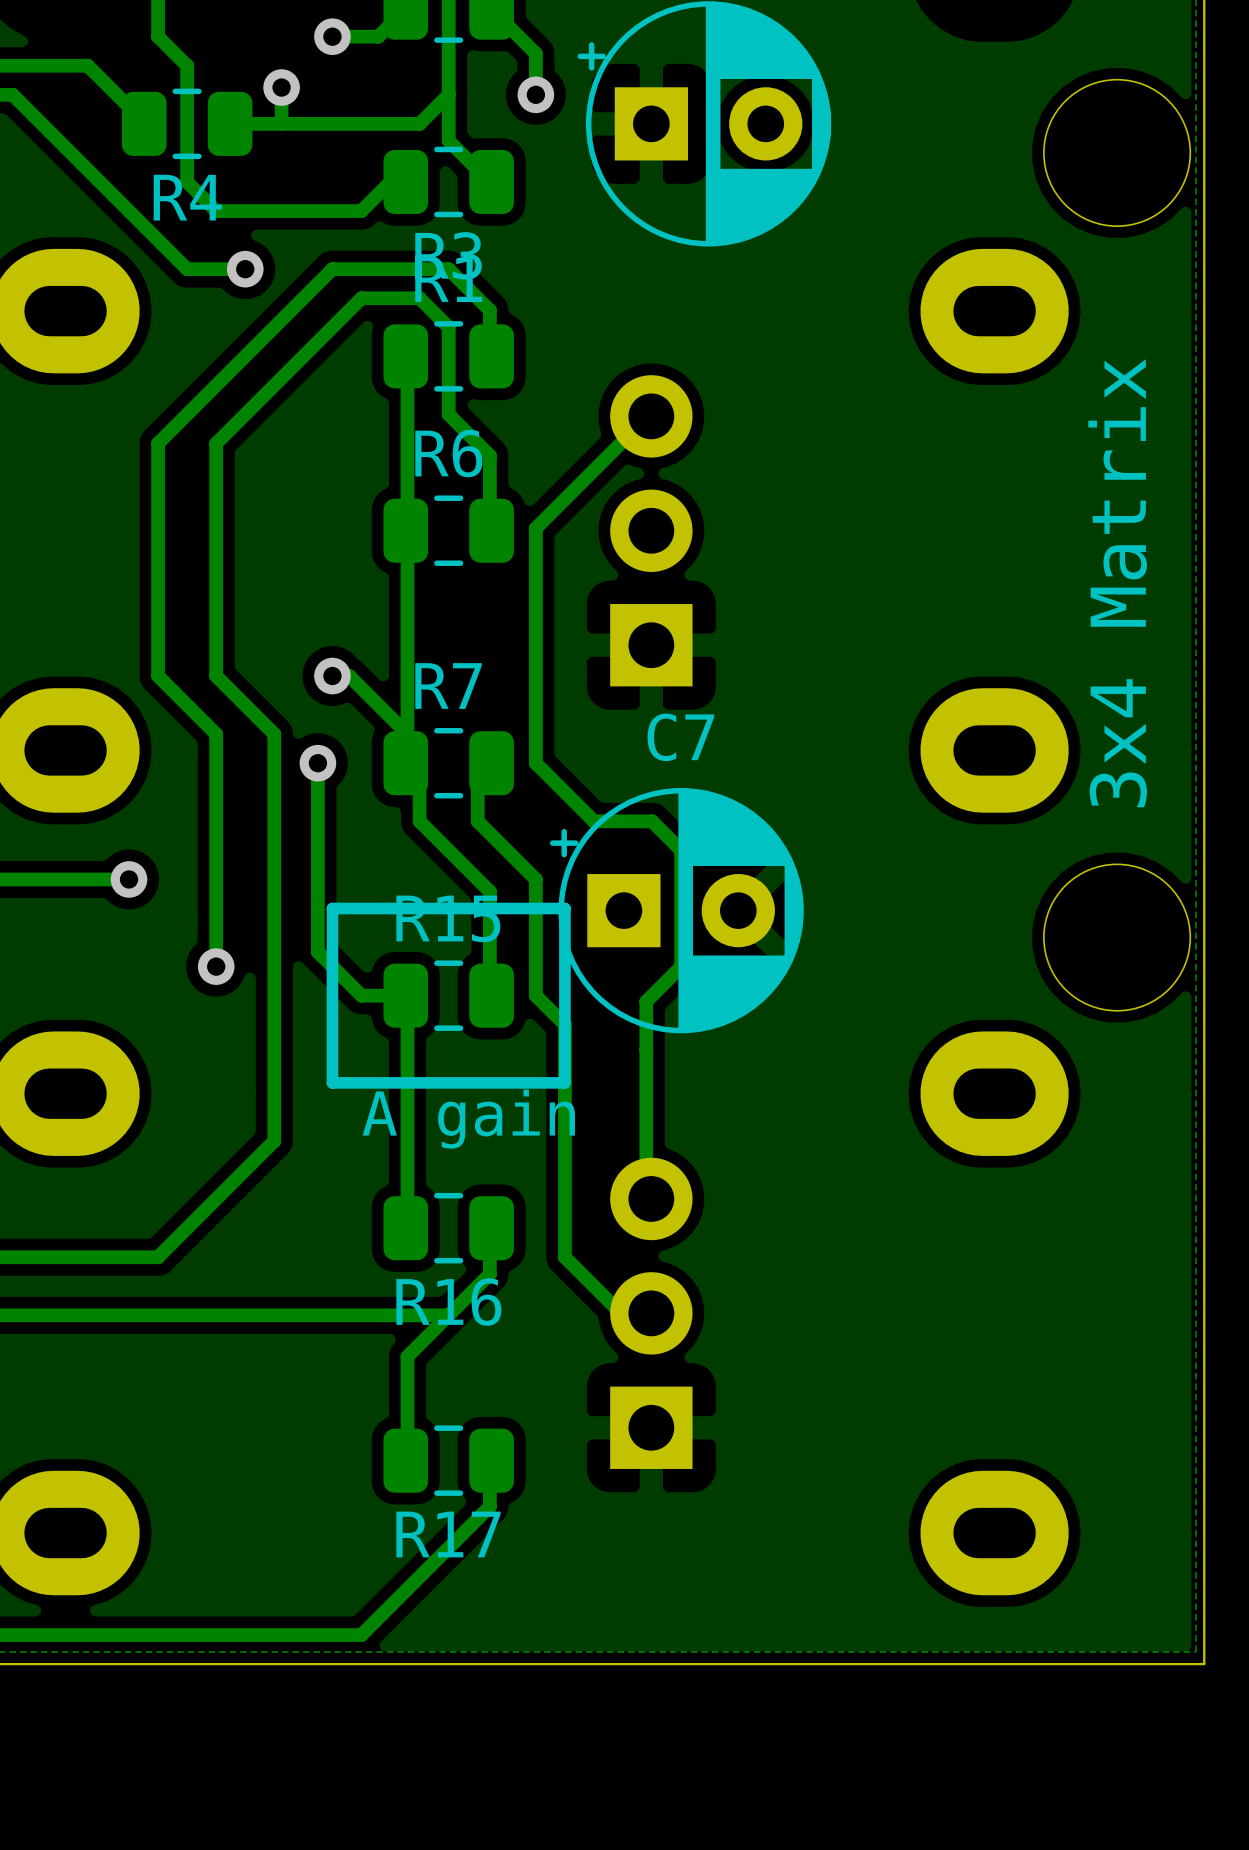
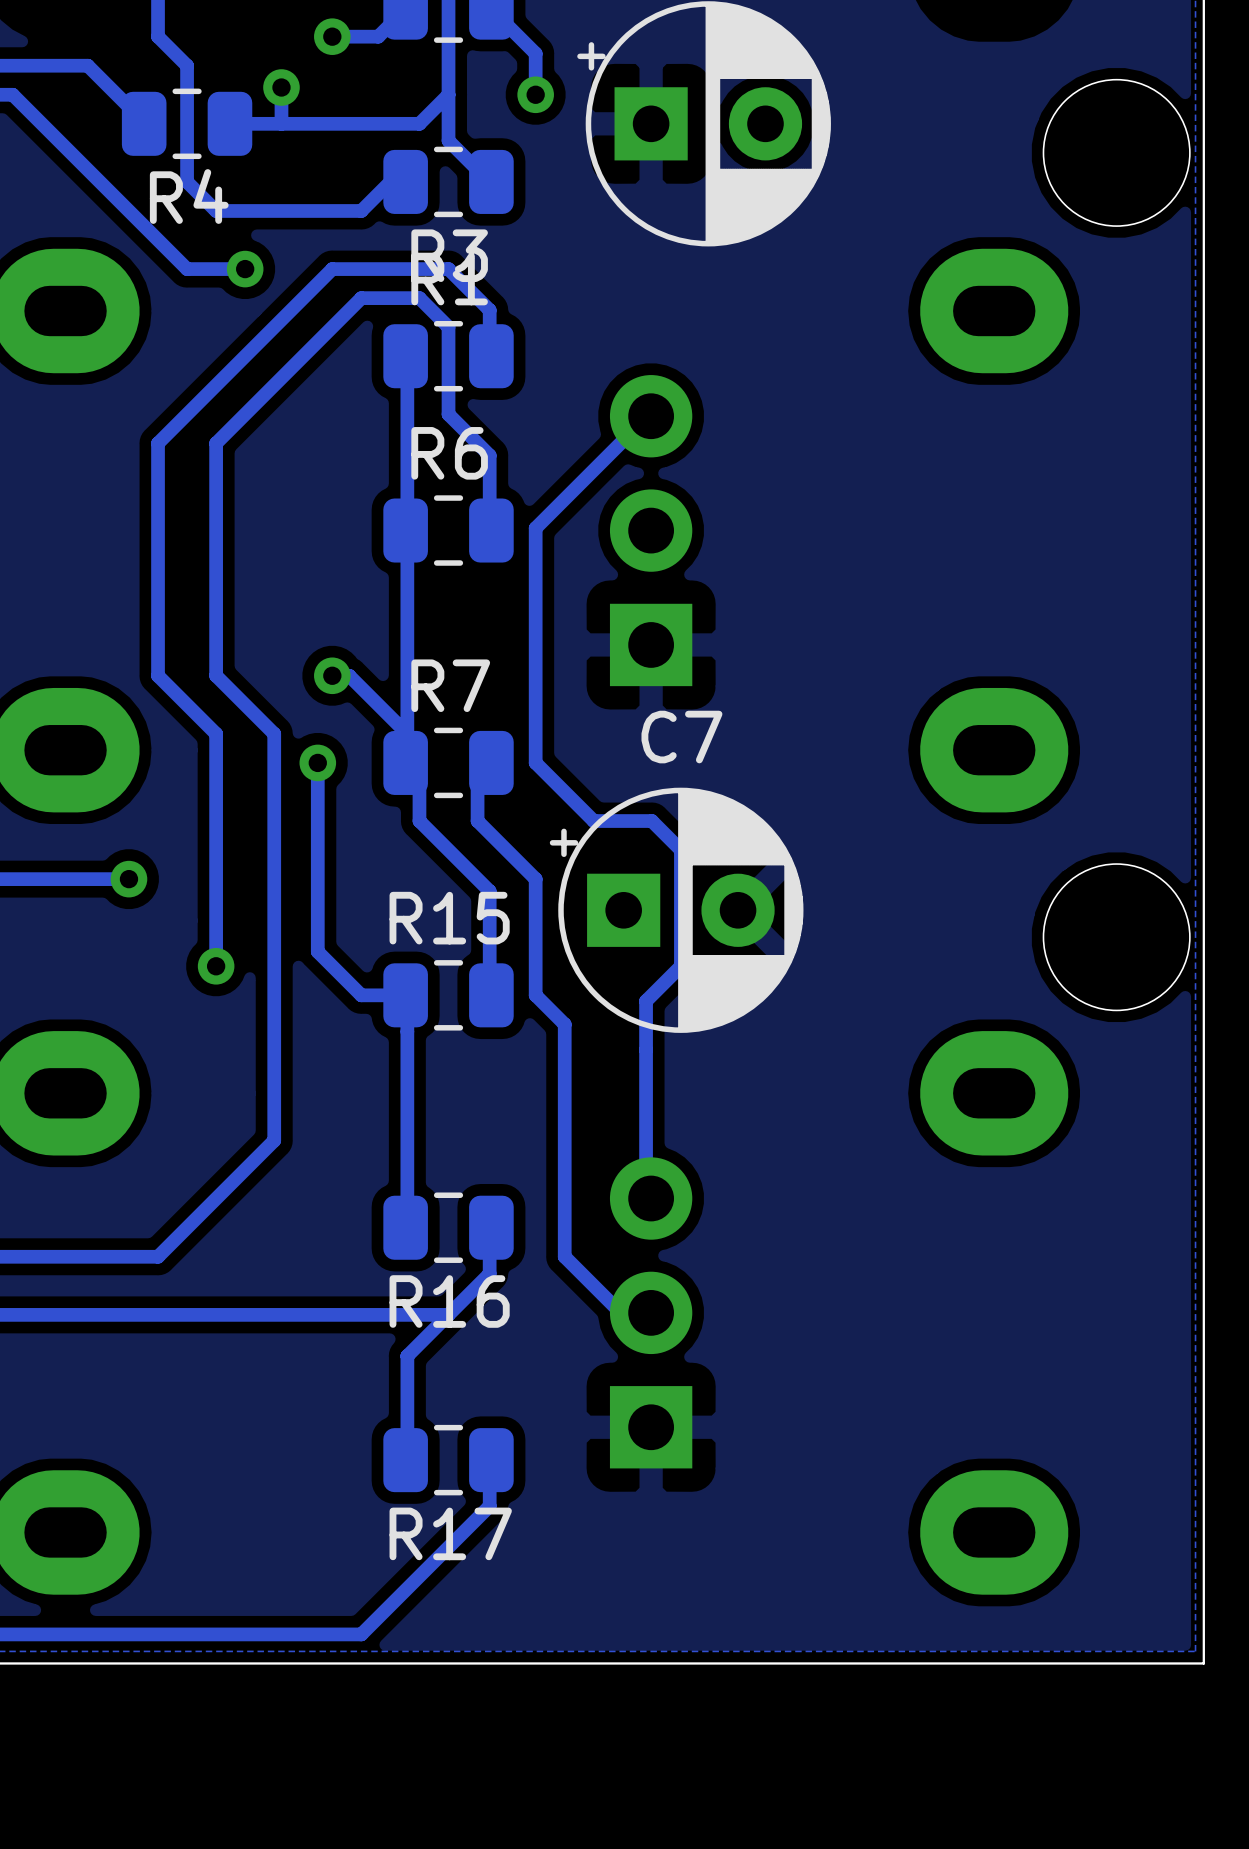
text: 3x4 Matrix (1117, 583) -> none
line: (564, 908) (332, 908) (332, 1082) (564, 1082) (564, 908) -> none
text: A gain (468, 1119) -> none

